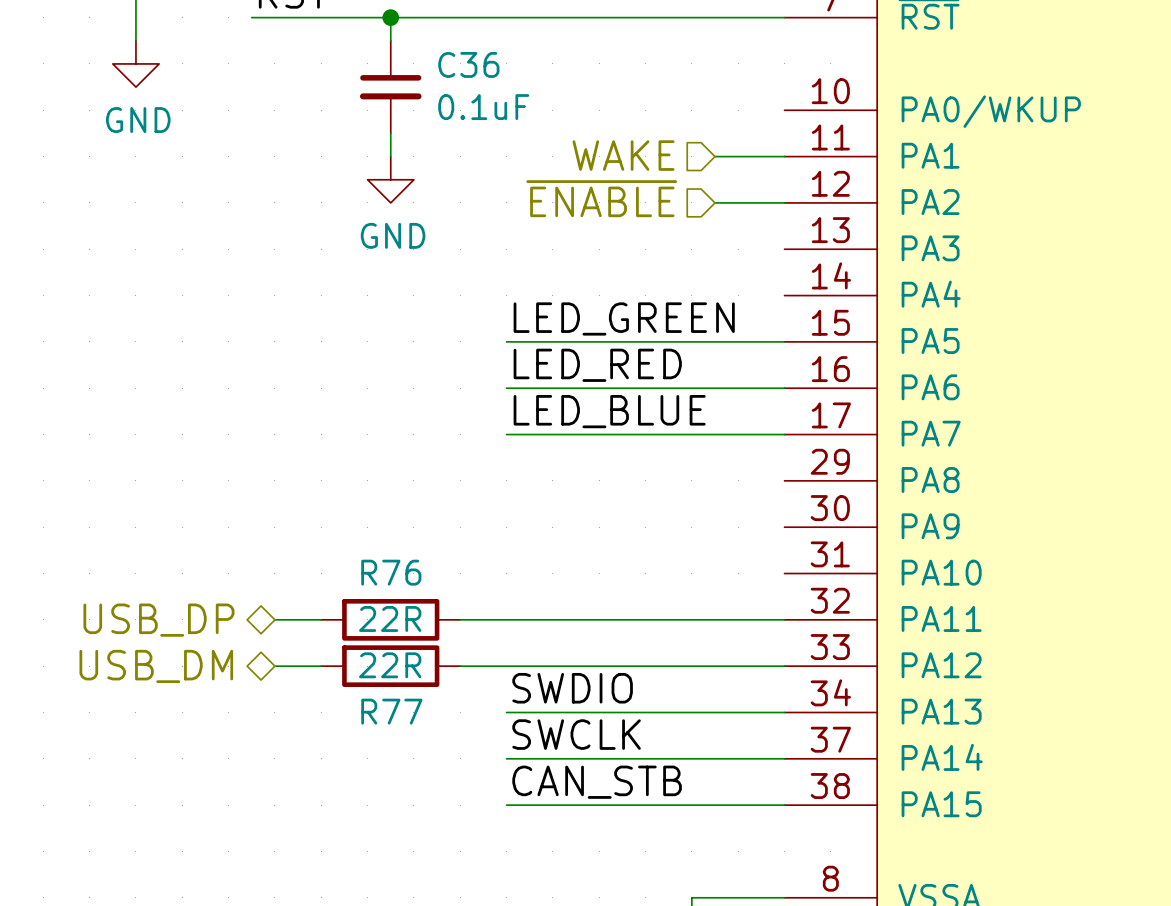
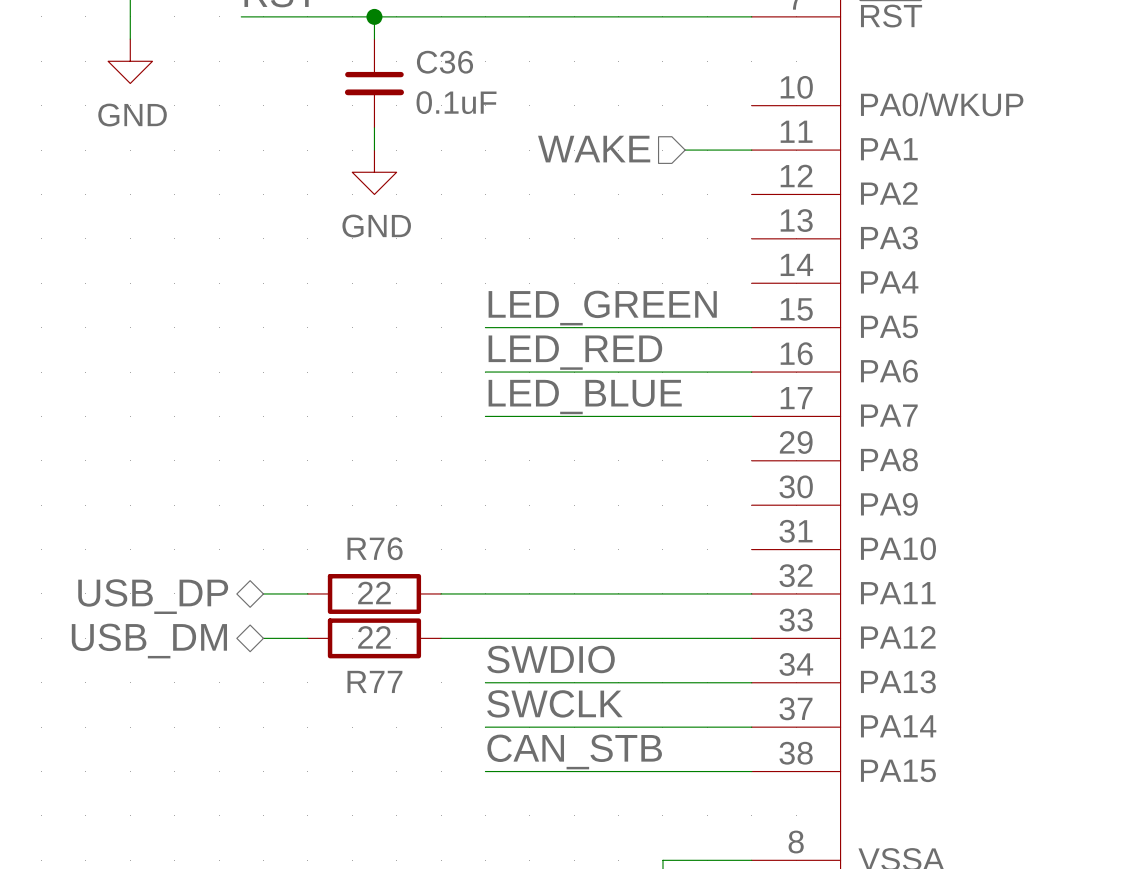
hierarchical label: ~{ENABLE} (601, 198) -> none
wire: (715, 202) (784, 202) -> none
R76 value: 22R (390, 618) -> 22 (374, 592)
R77 value: 22R (390, 665) -> 22 (374, 637)

